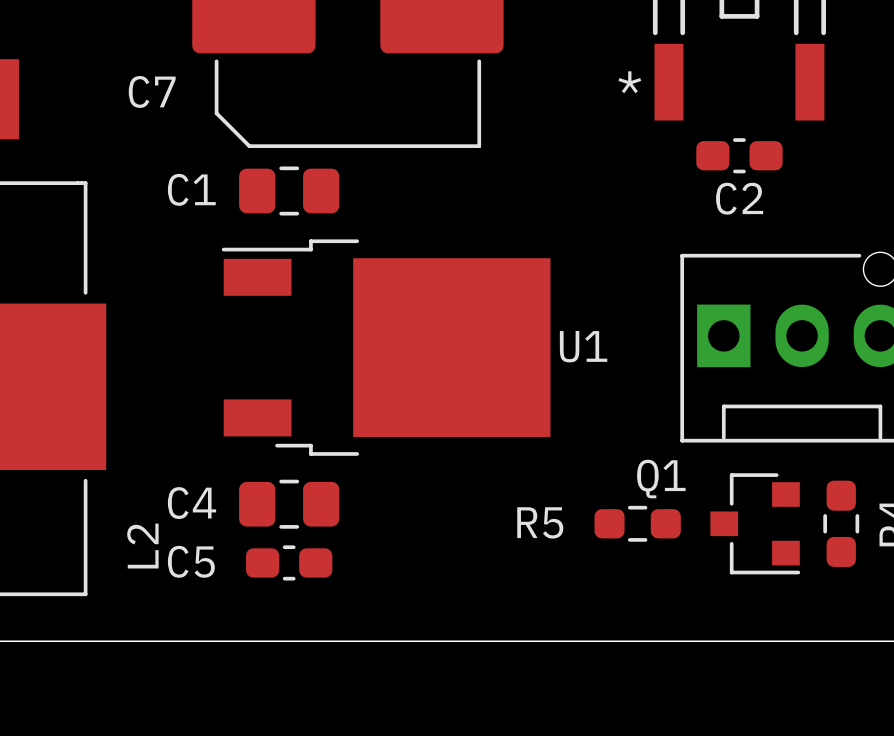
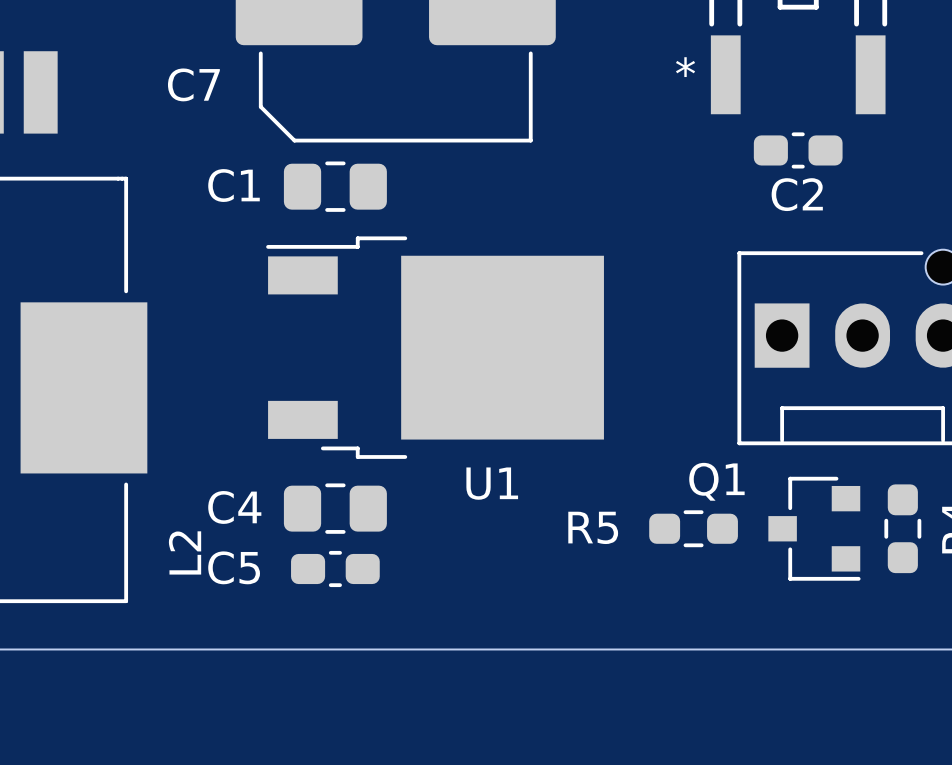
U1 name position: U1 (583, 346) -> U1 (492, 483)

